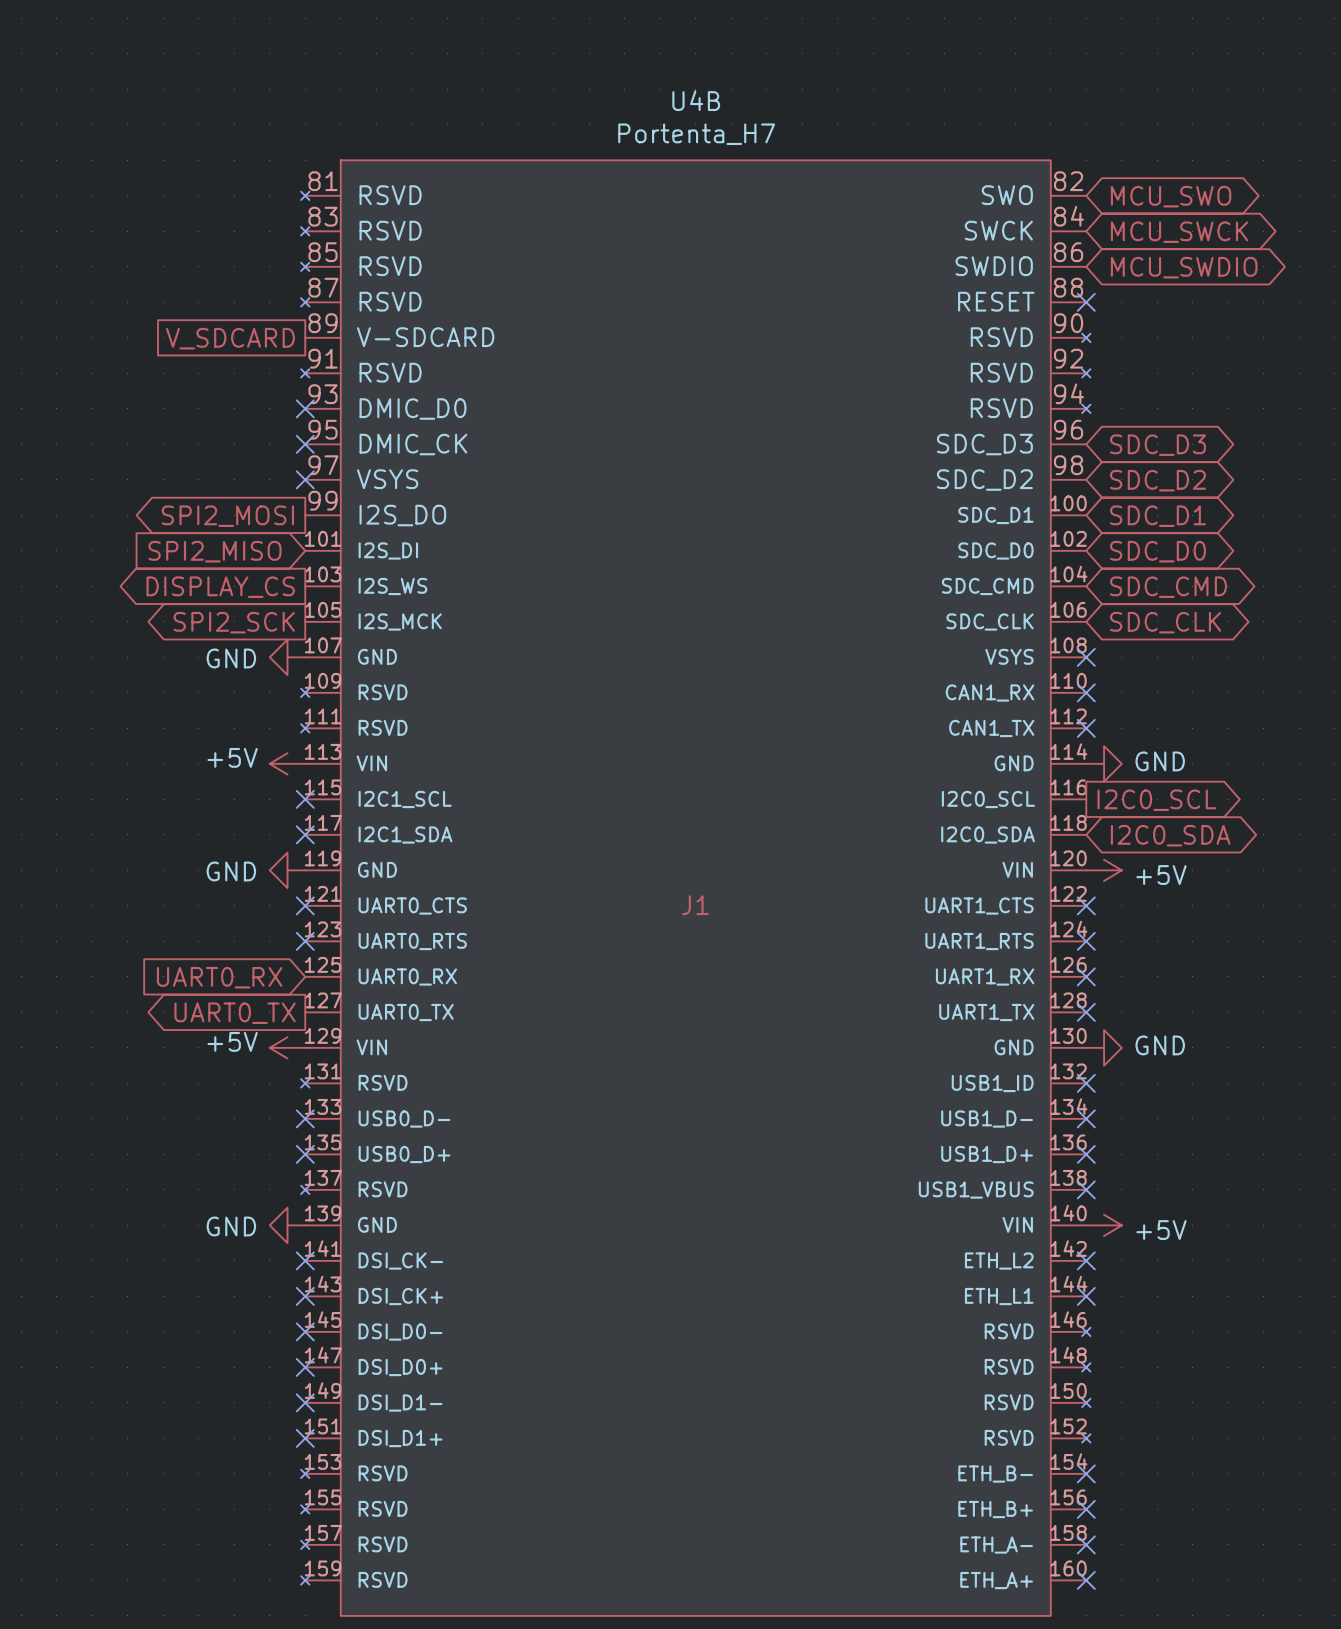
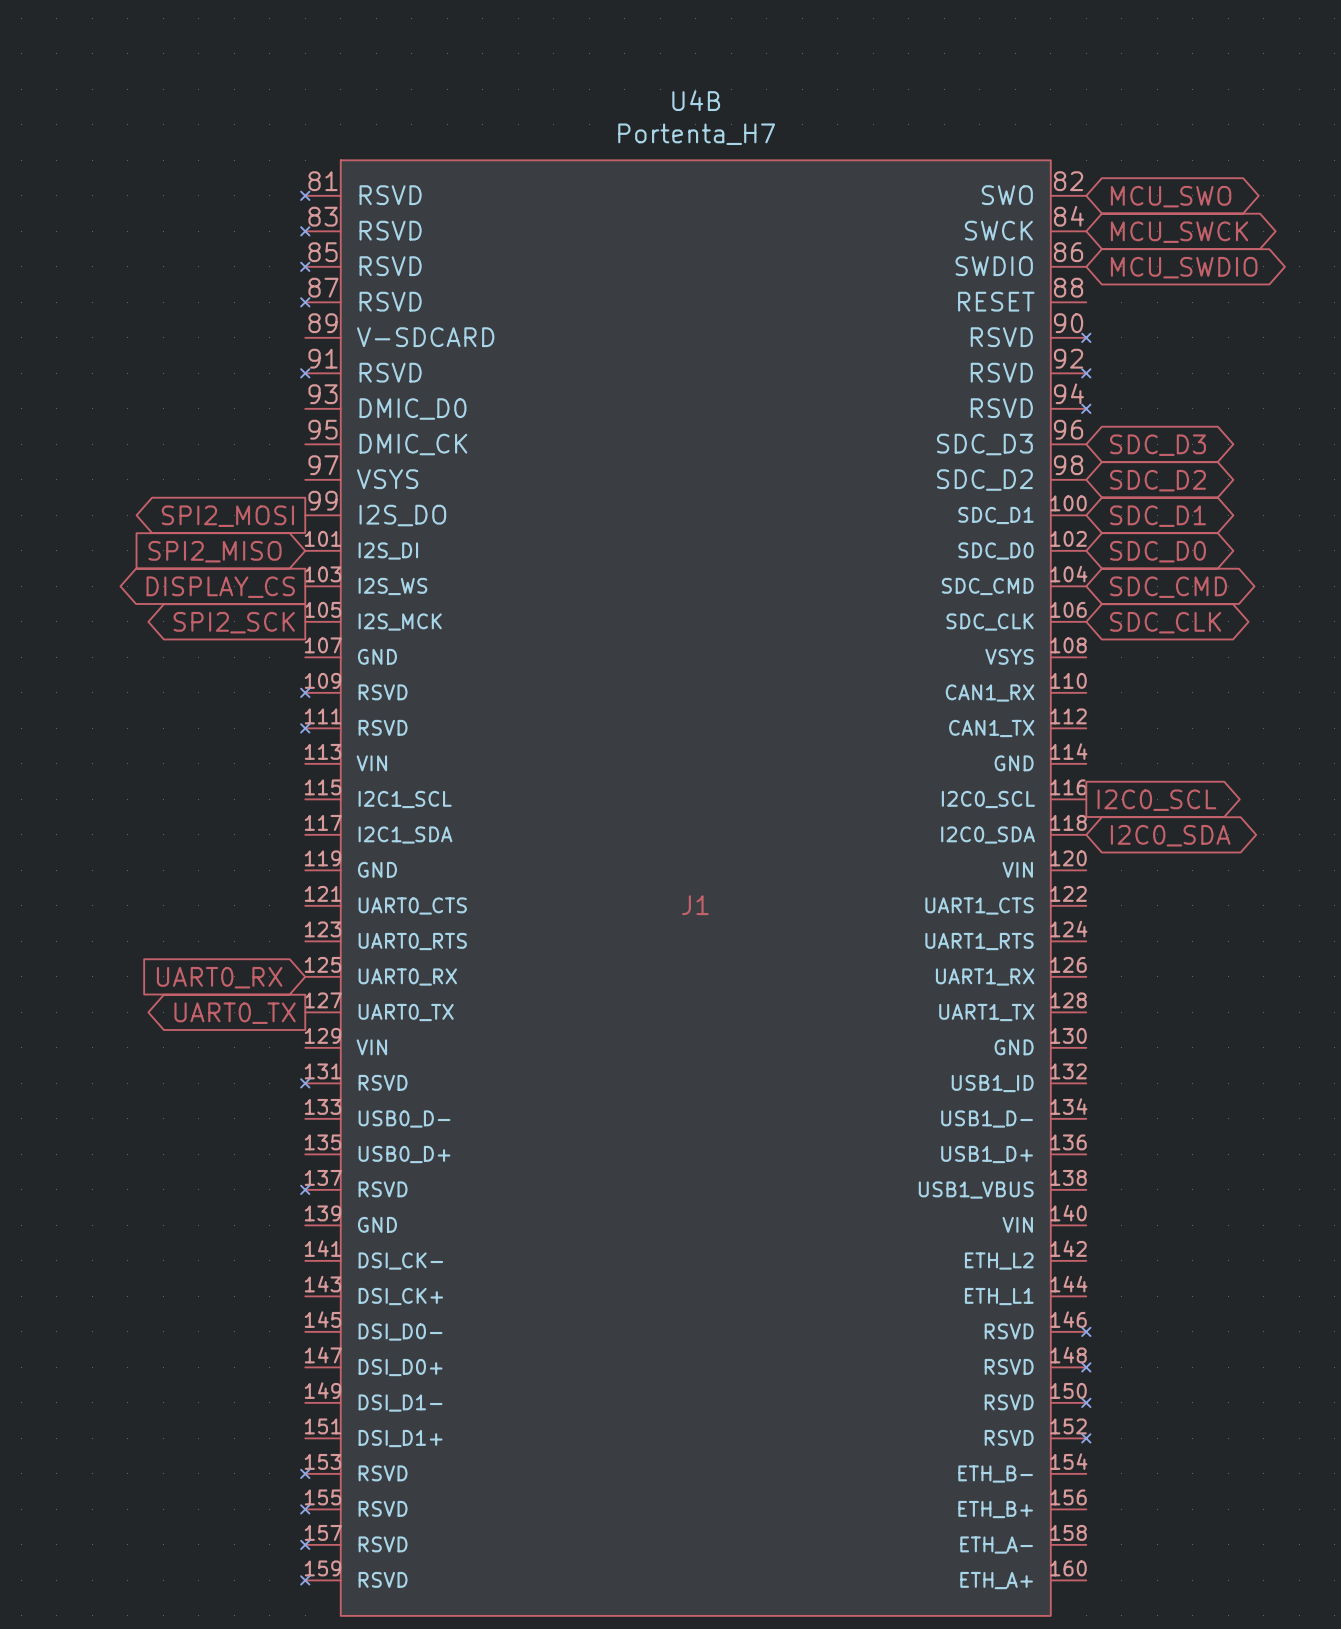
no-connect mark: (1086, 302) -> none
global label: V_SDCARD (230, 338) -> none
no-connect mark: (305, 408) -> none
no-connect mark: (305, 444) -> none
no-connect mark: (305, 479) -> none
power symbol: GND (287, 657) -> none
no-connect mark: (1086, 657) -> none
no-connect mark: (1086, 692) -> none
no-connect mark: (1086, 728) -> none
power symbol: +5V (287, 763) -> none
power symbol: GND (1104, 763) -> none
no-connect mark: (305, 799) -> none
no-connect mark: (305, 834) -> none
power symbol: GND (287, 870) -> none
power symbol: +5V (1104, 870) -> none
no-connect mark: (305, 905) -> none
no-connect mark: (1086, 905) -> none
no-connect mark: (305, 941) -> none
no-connect mark: (1086, 941) -> none
no-connect mark: (1086, 976) -> none
no-connect mark: (1086, 1012) -> none
power symbol: +5V (287, 1047) -> none
power symbol: GND (1104, 1047) -> none
no-connect mark: (1086, 1083) -> none
no-connect mark: (305, 1118) -> none
no-connect mark: (1086, 1118) -> none
no-connect mark: (305, 1154) -> none
no-connect mark: (1086, 1154) -> none
no-connect mark: (1086, 1189) -> none
power symbol: GND (287, 1225) -> none
power symbol: +5V (1104, 1225) -> none
no-connect mark: (305, 1260) -> none
no-connect mark: (1086, 1260) -> none
no-connect mark: (305, 1296) -> none
no-connect mark: (1086, 1296) -> none
no-connect mark: (305, 1331) -> none
no-connect mark: (305, 1367) -> none
no-connect mark: (305, 1402) -> none
no-connect mark: (305, 1438) -> none
no-connect mark: (1086, 1473) -> none
no-connect mark: (1086, 1509) -> none
no-connect mark: (1086, 1544) -> none
no-connect mark: (1086, 1580) -> none

